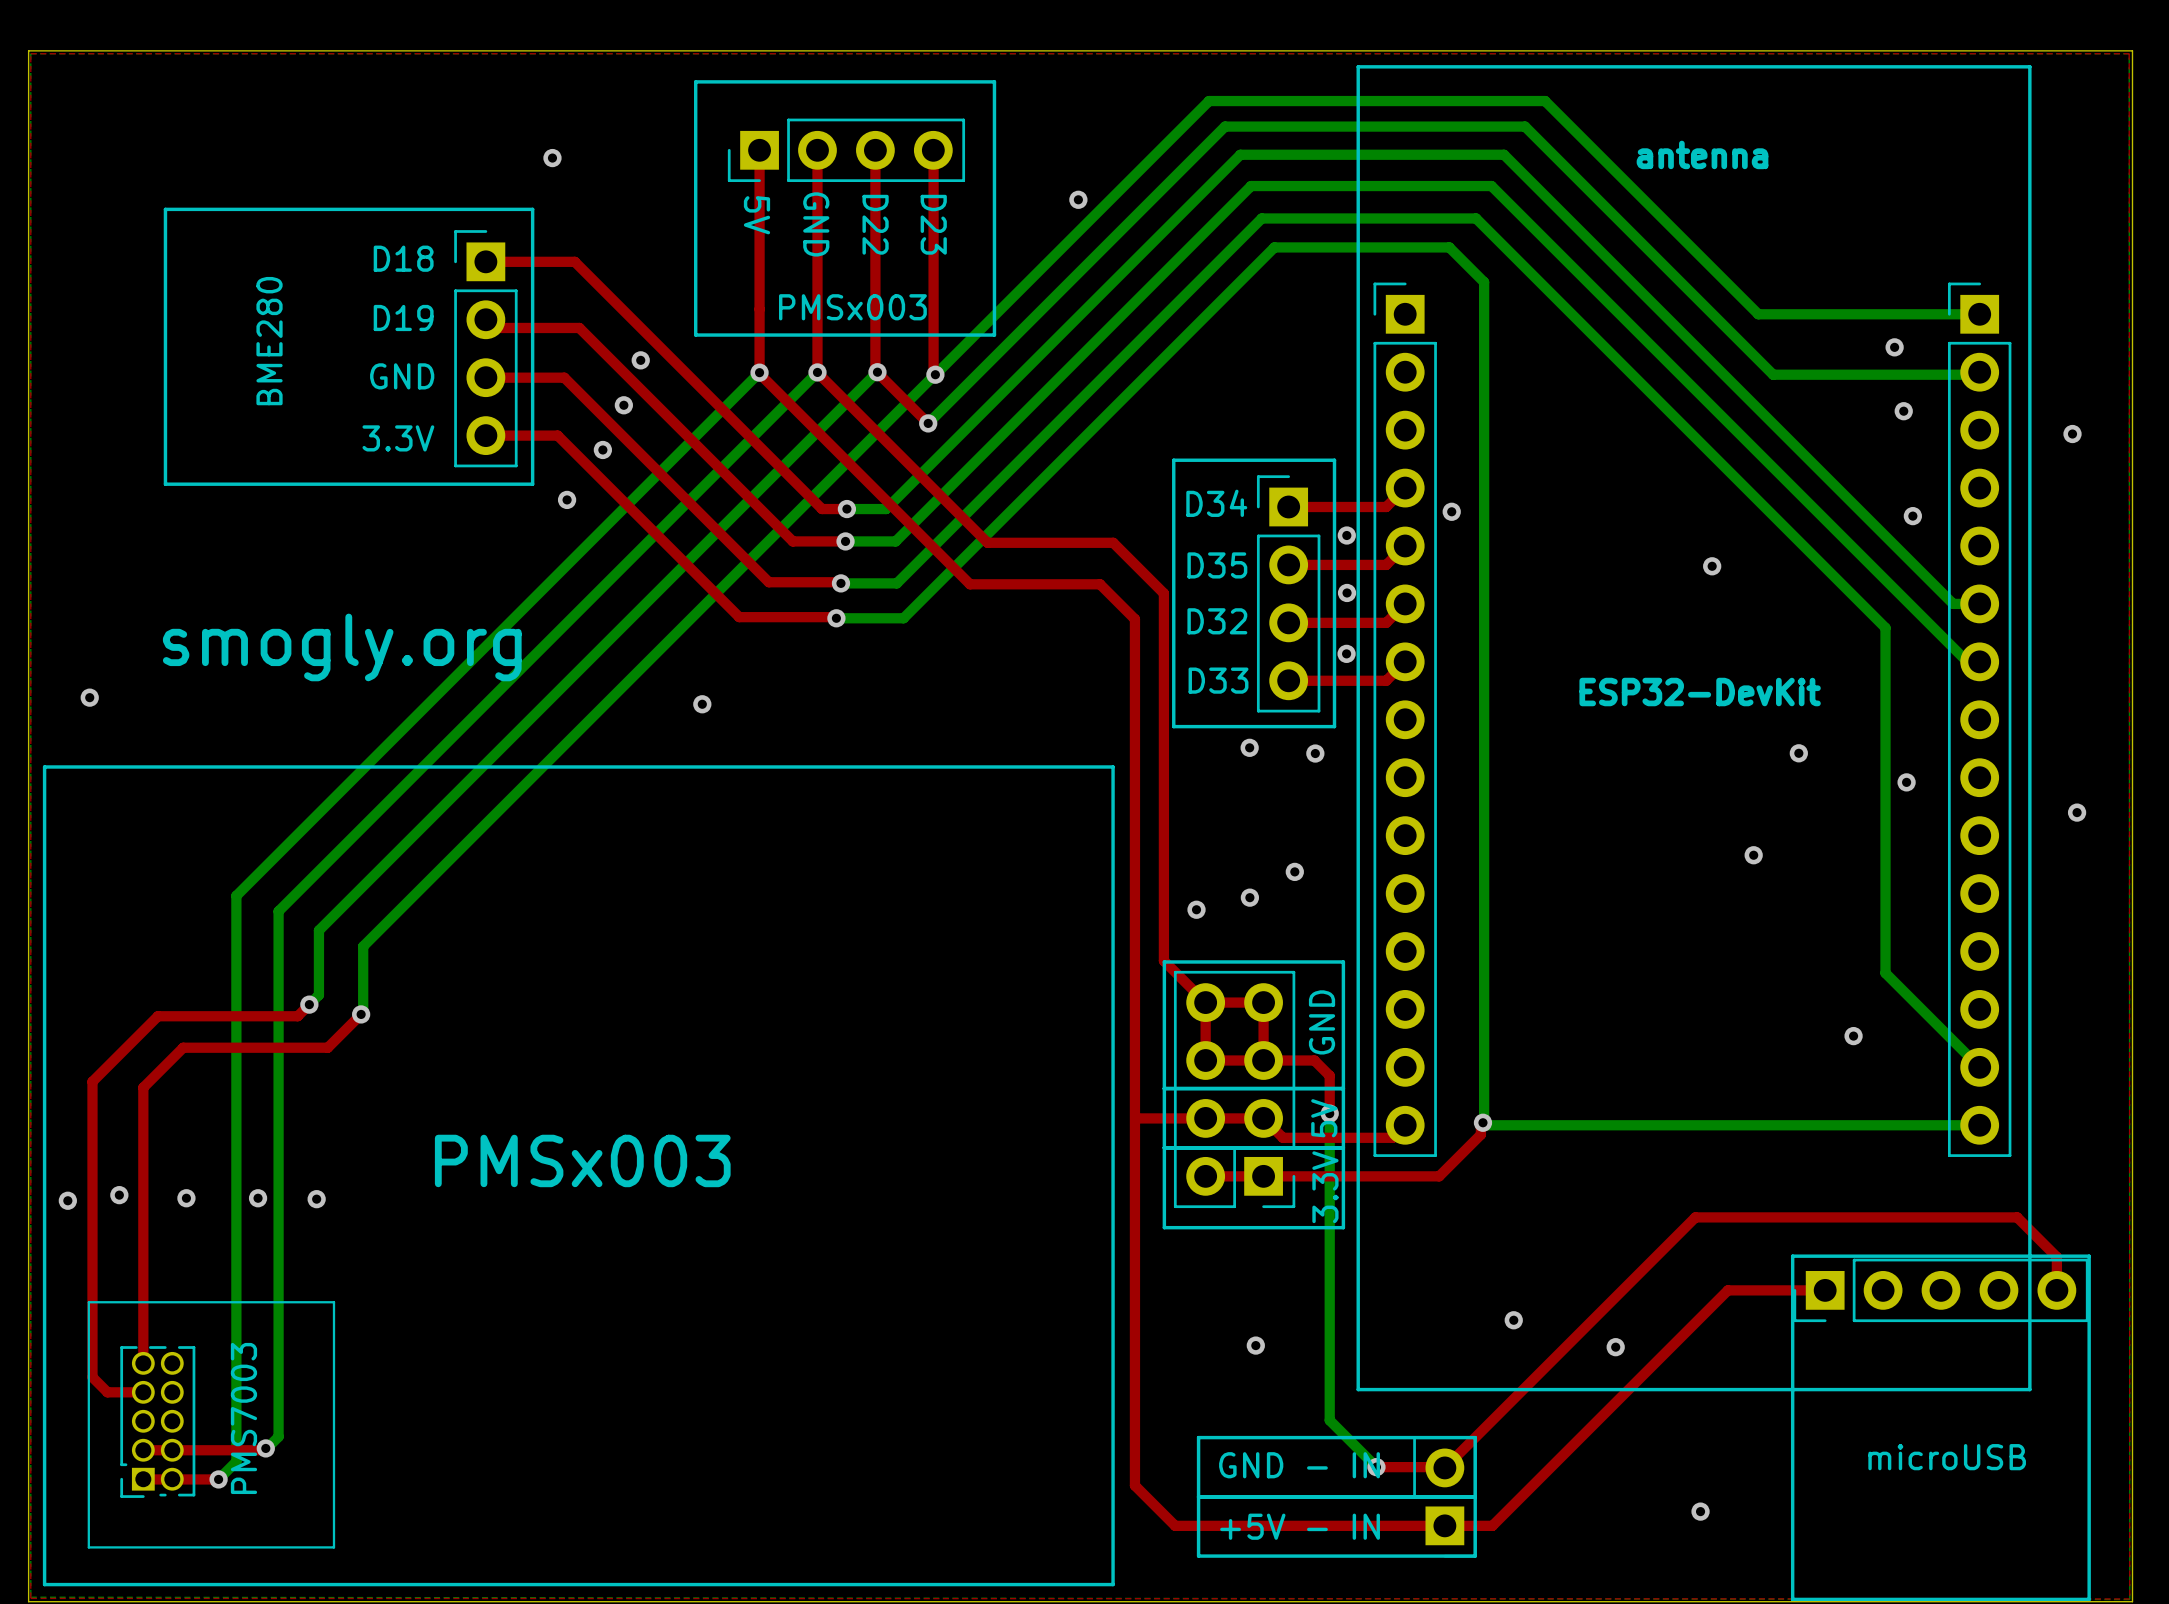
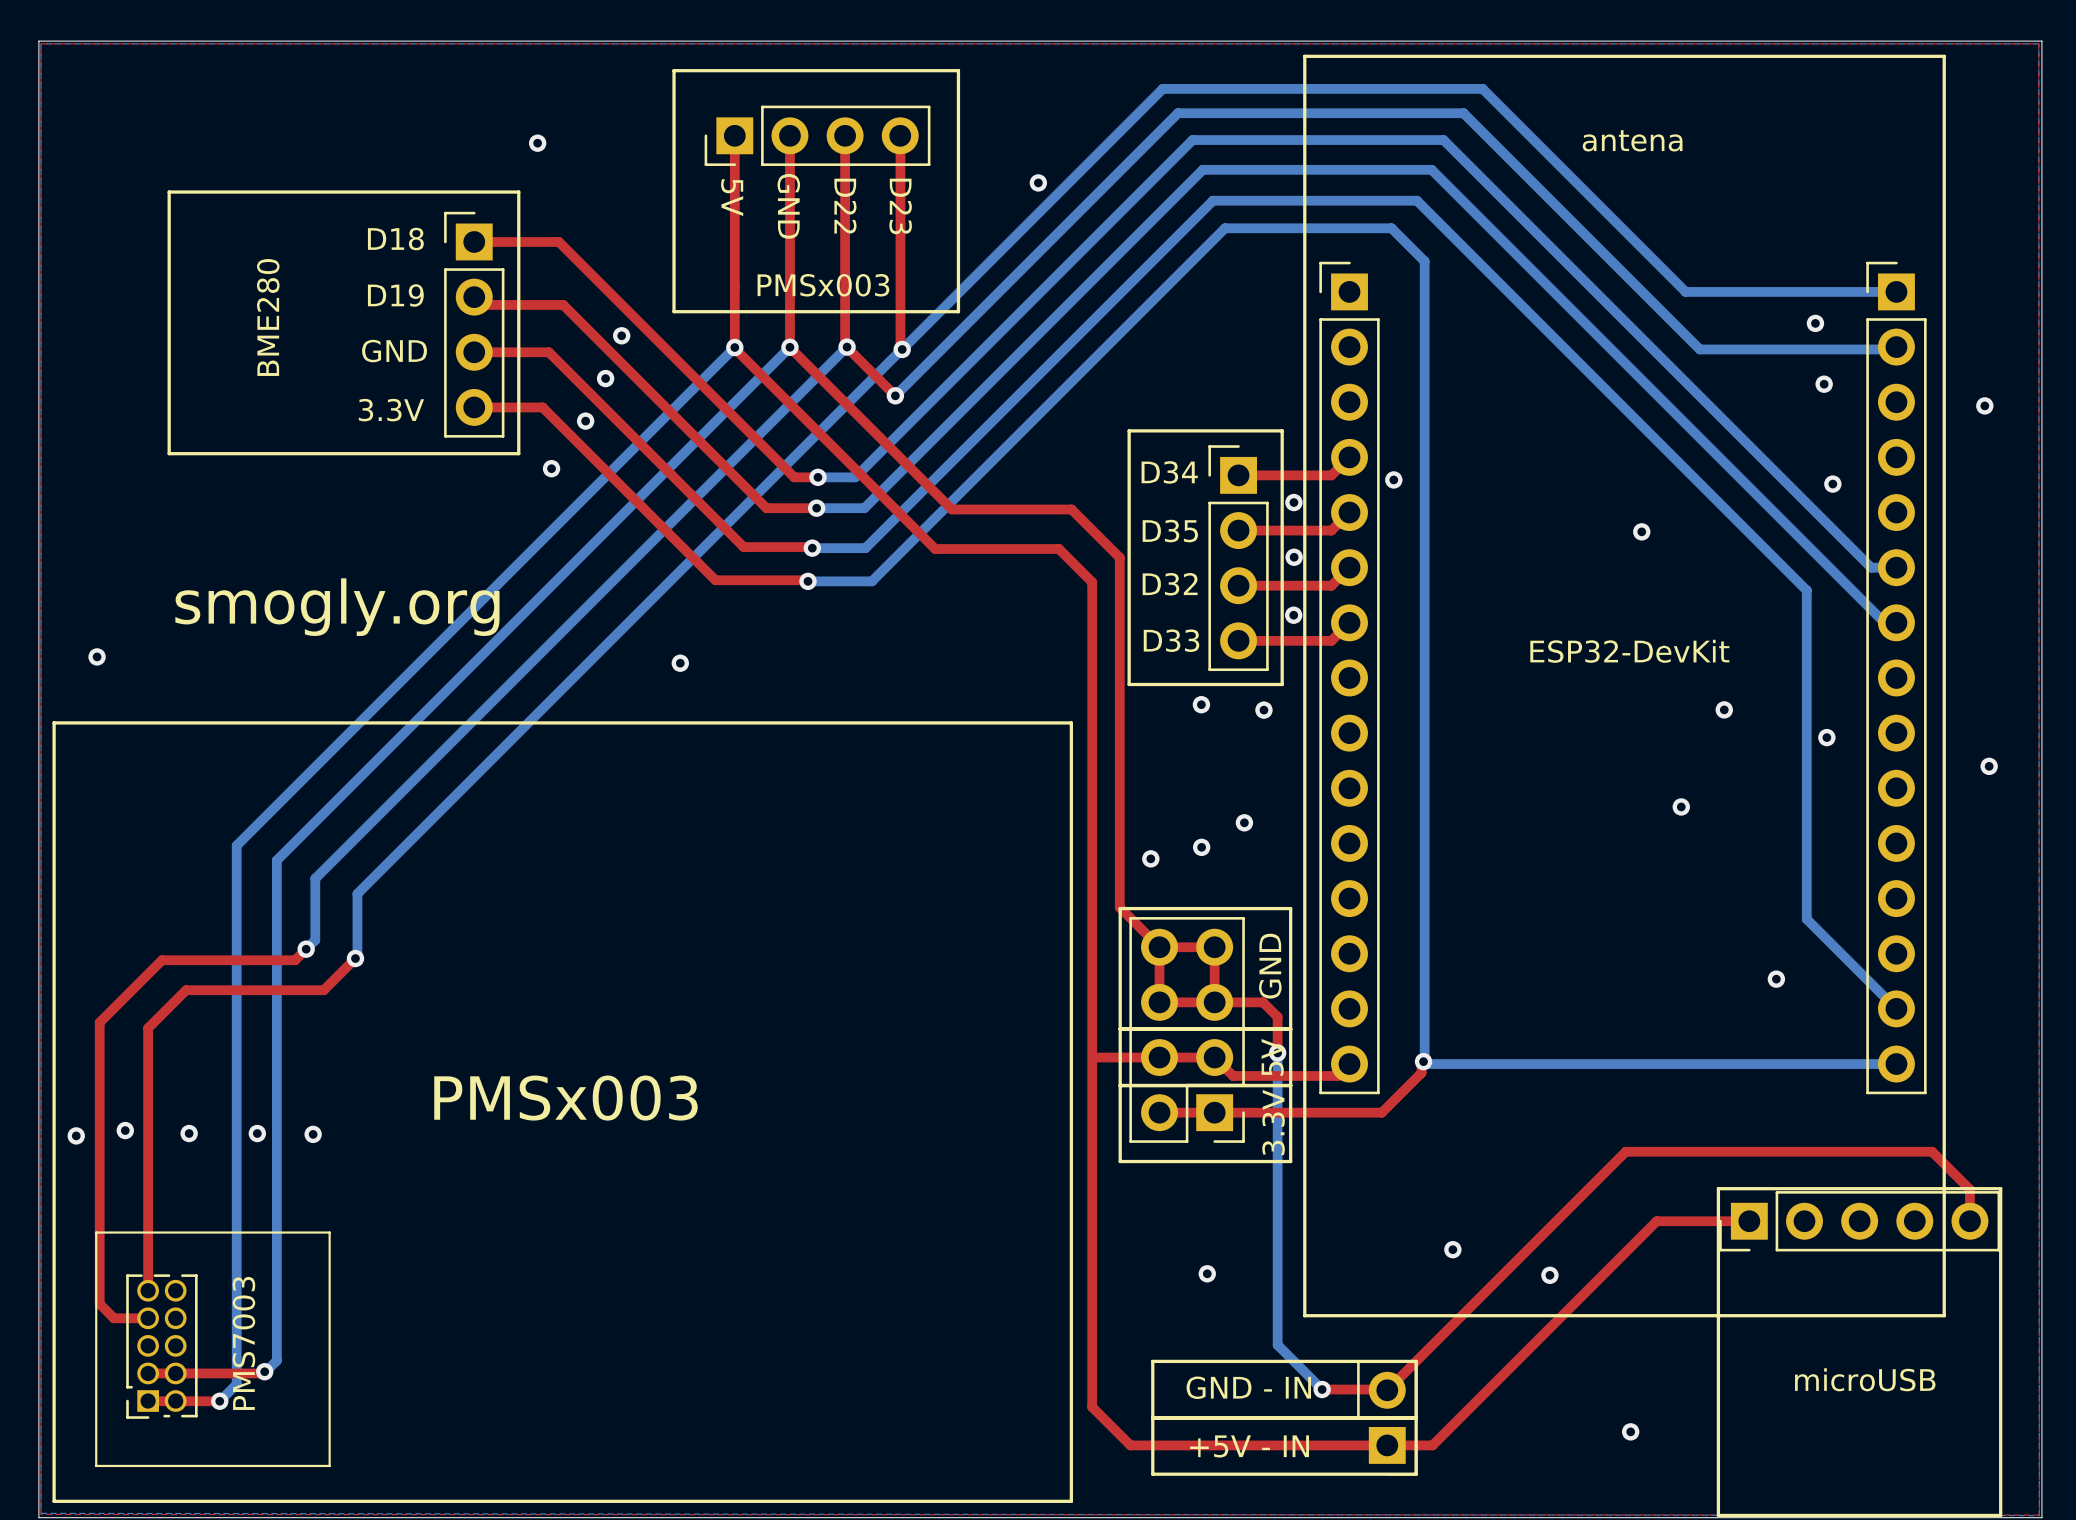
text: antenna (1702, 154) -> antena (1632, 140)

